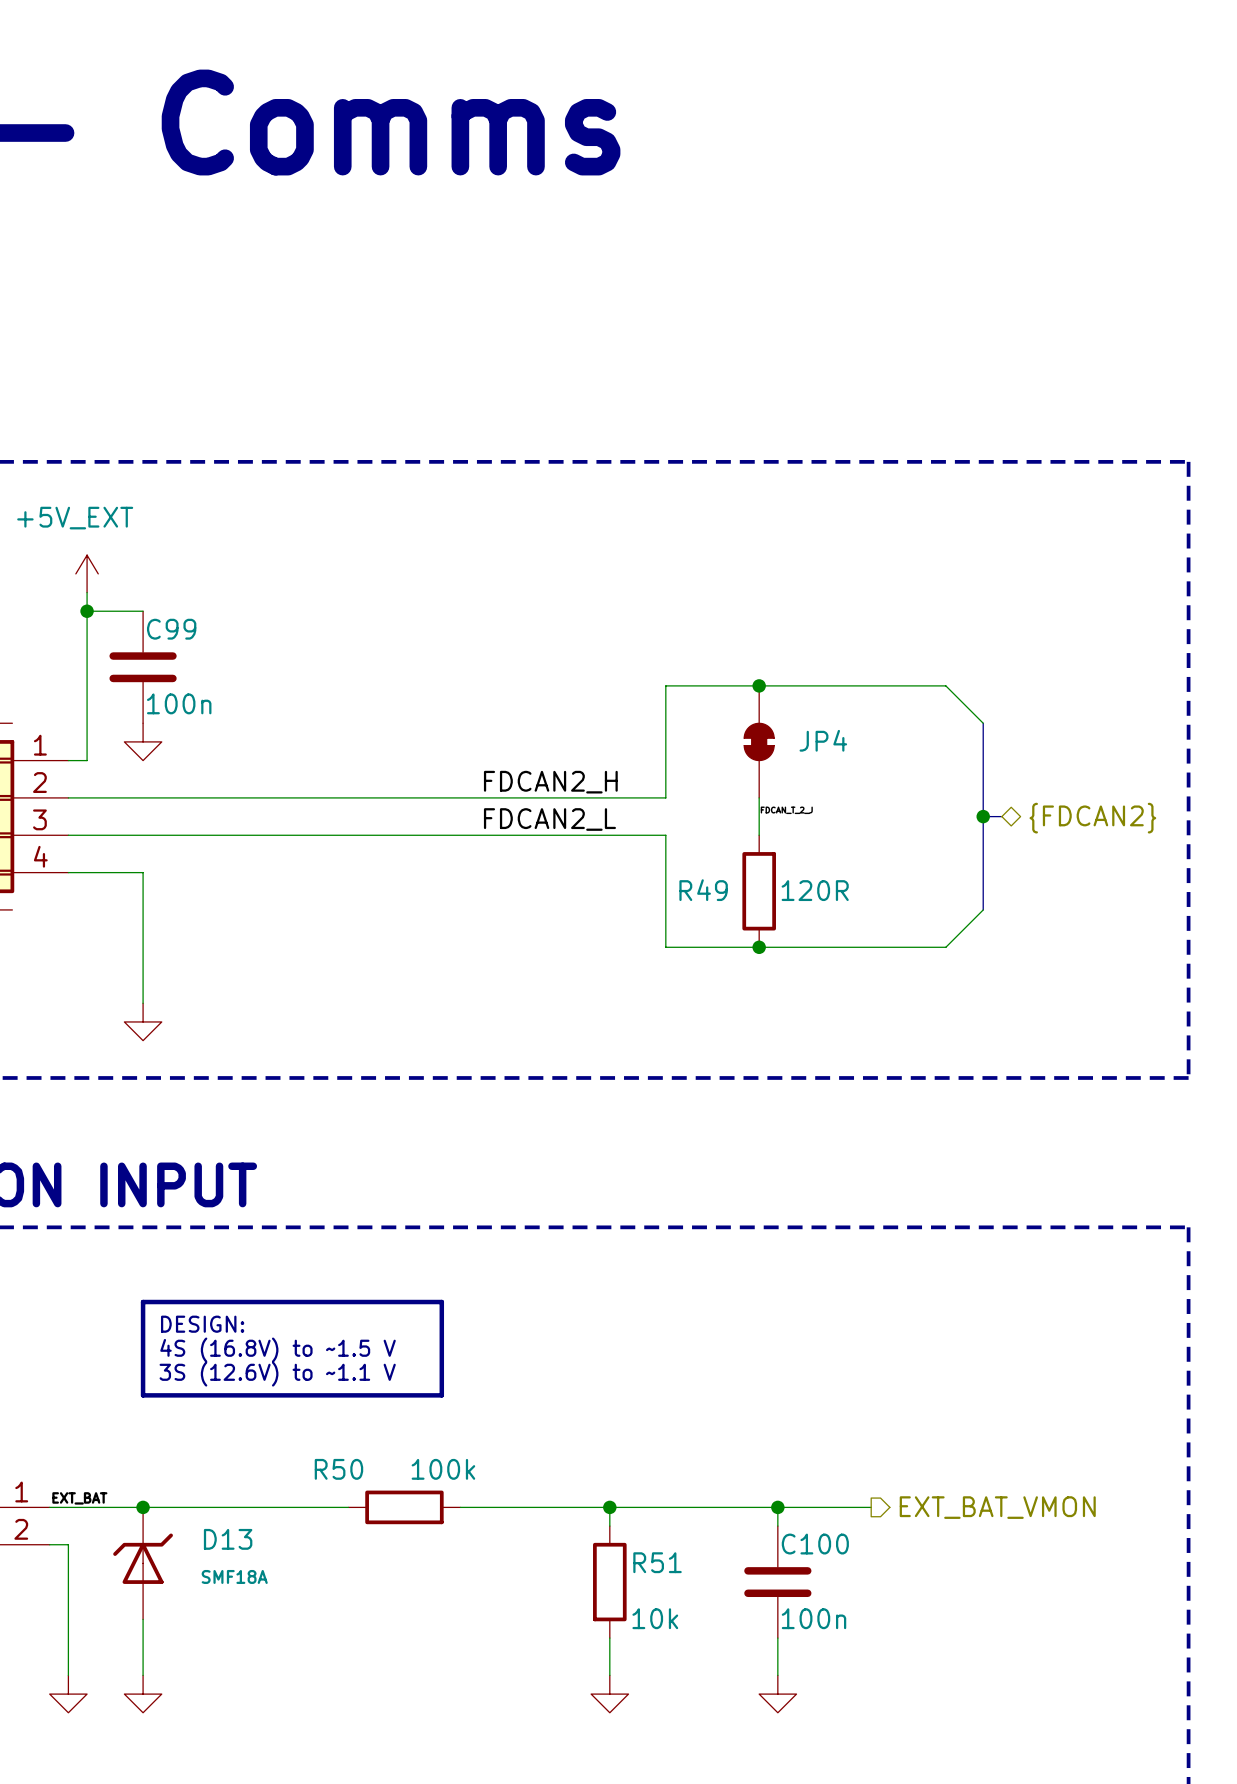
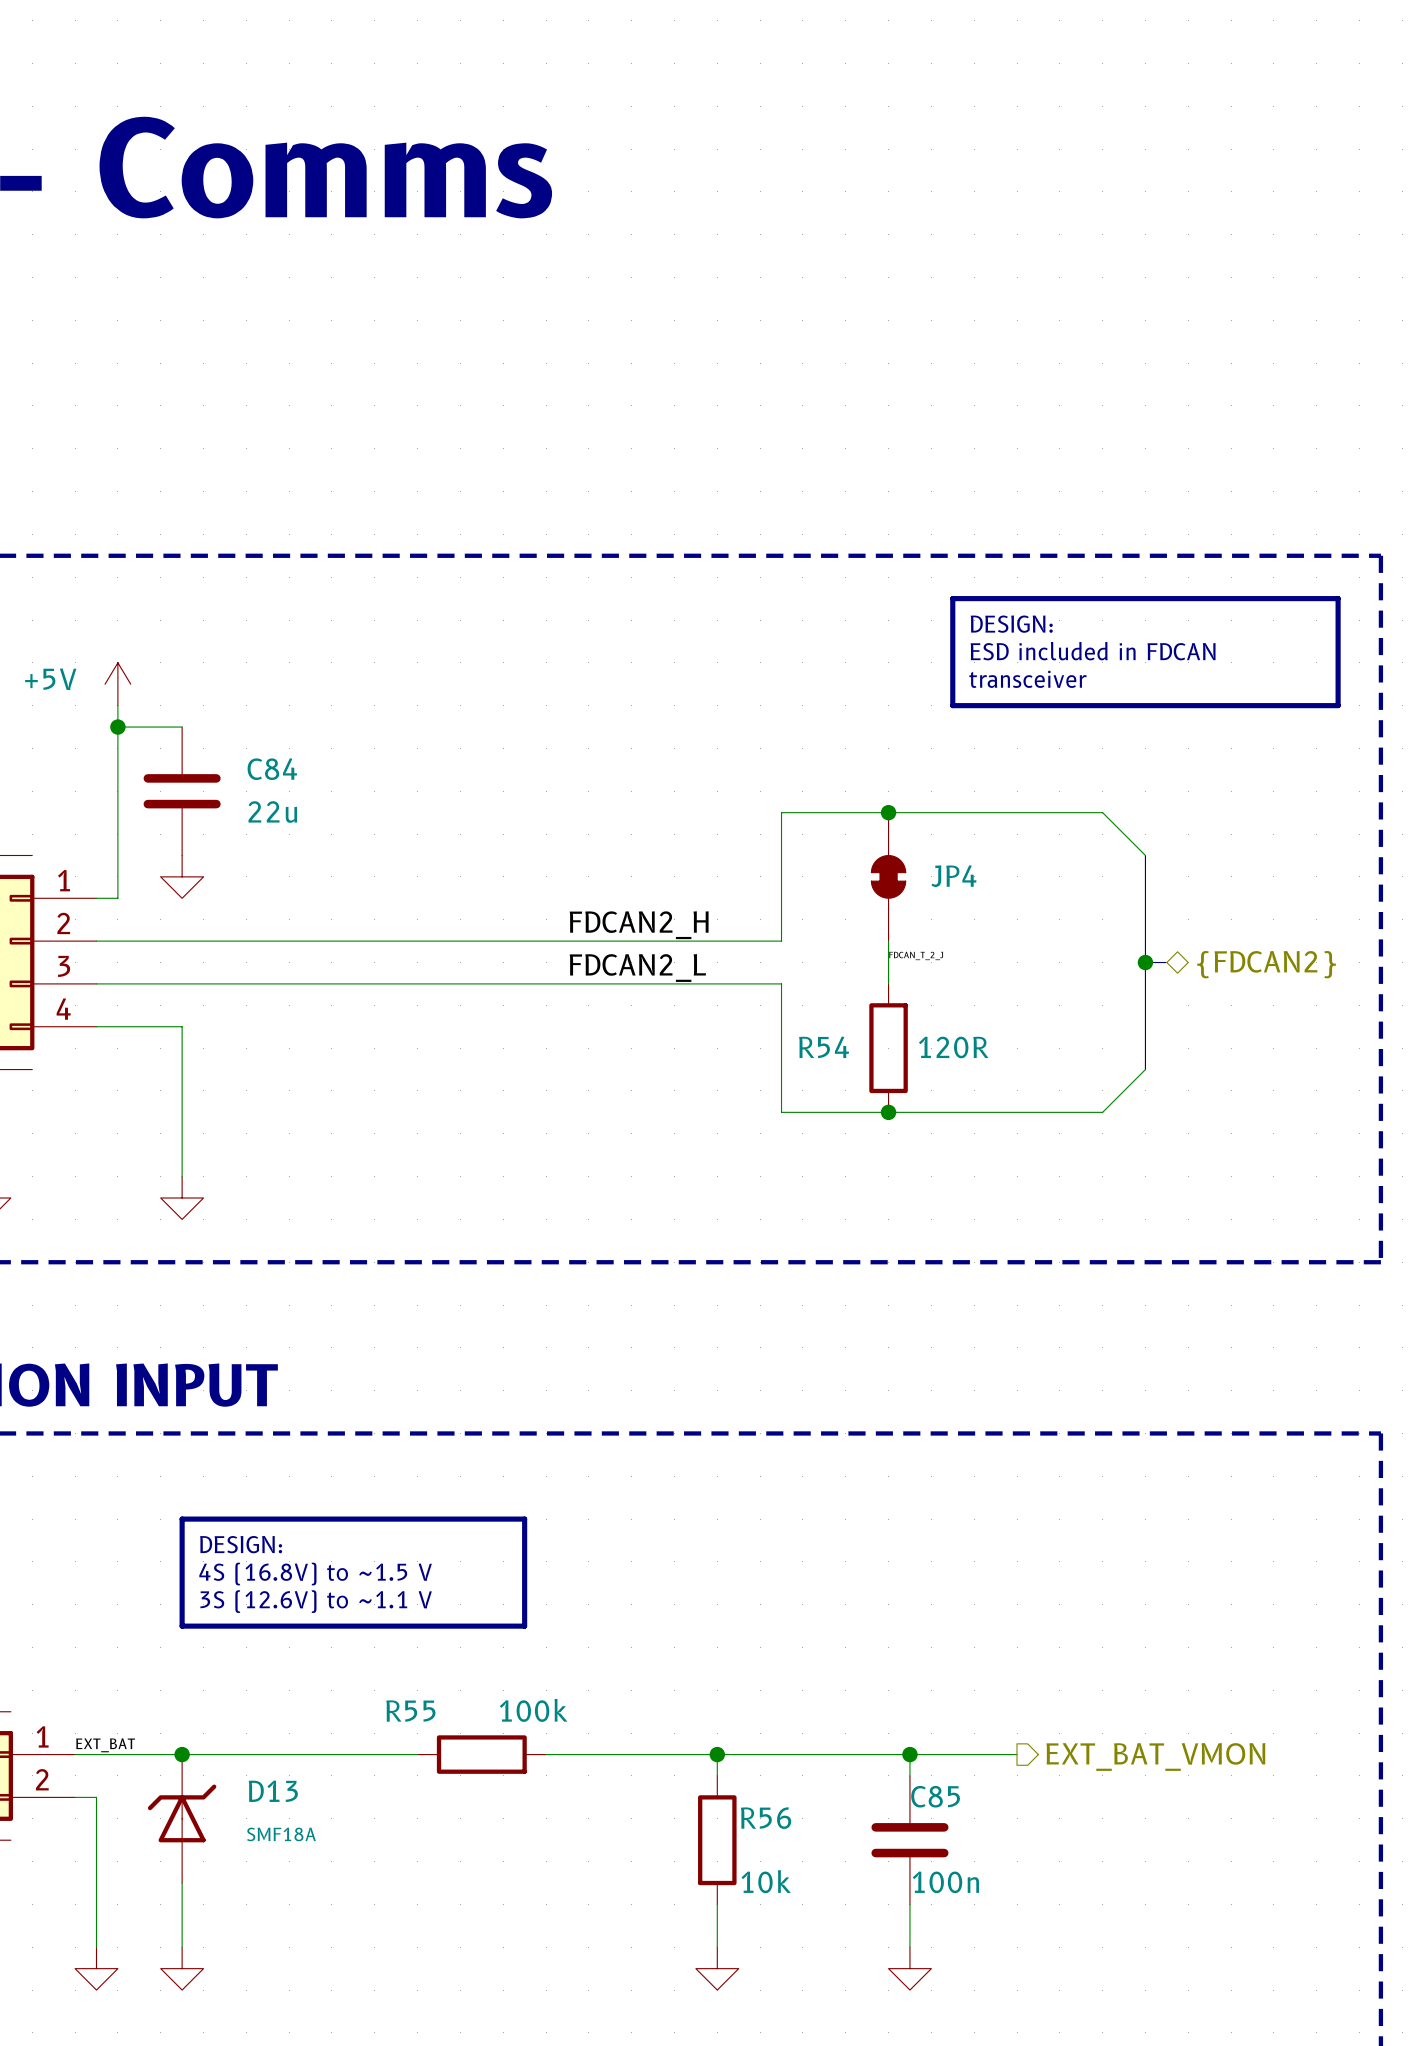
line: none -> (952, 598) (1338, 598) (1338, 705) (952, 705) (952, 598)
text: none -> DESIGN: (1011, 624)
text: none -> ESD included in FDCAN (1093, 651)
text: none -> transceiver (1027, 679)
power symbol: +5V_EXT (87, 573) -> +5V (117, 684)
C99 name: C99 (171, 629) -> C84 (272, 769)
C99 value: 100n (179, 703) -> 22u (272, 812)
R49 name: R49 (703, 890) -> R54 (824, 1047)
R50 name: R50 (338, 1469) -> R55 (410, 1711)
C100 name: C100 (815, 1544) -> C85 (935, 1796)
R51 name: R51 (657, 1562) -> R56 (766, 1818)

